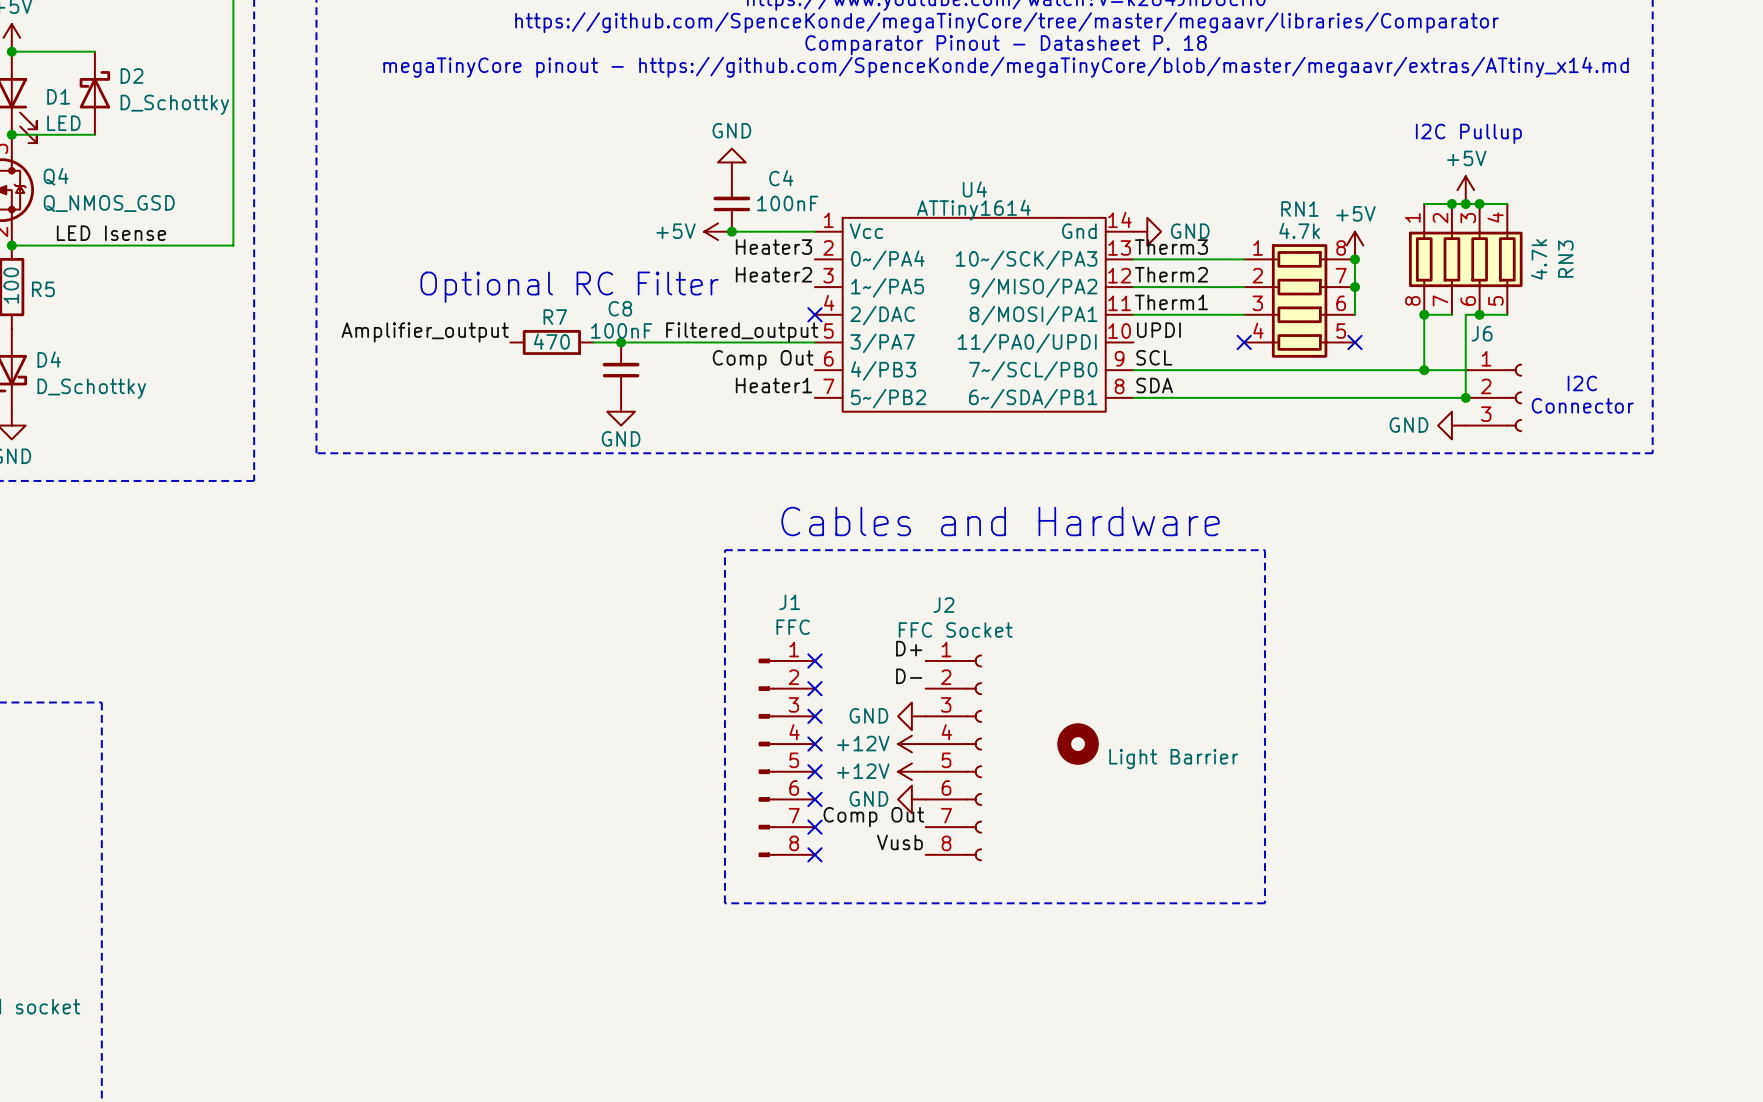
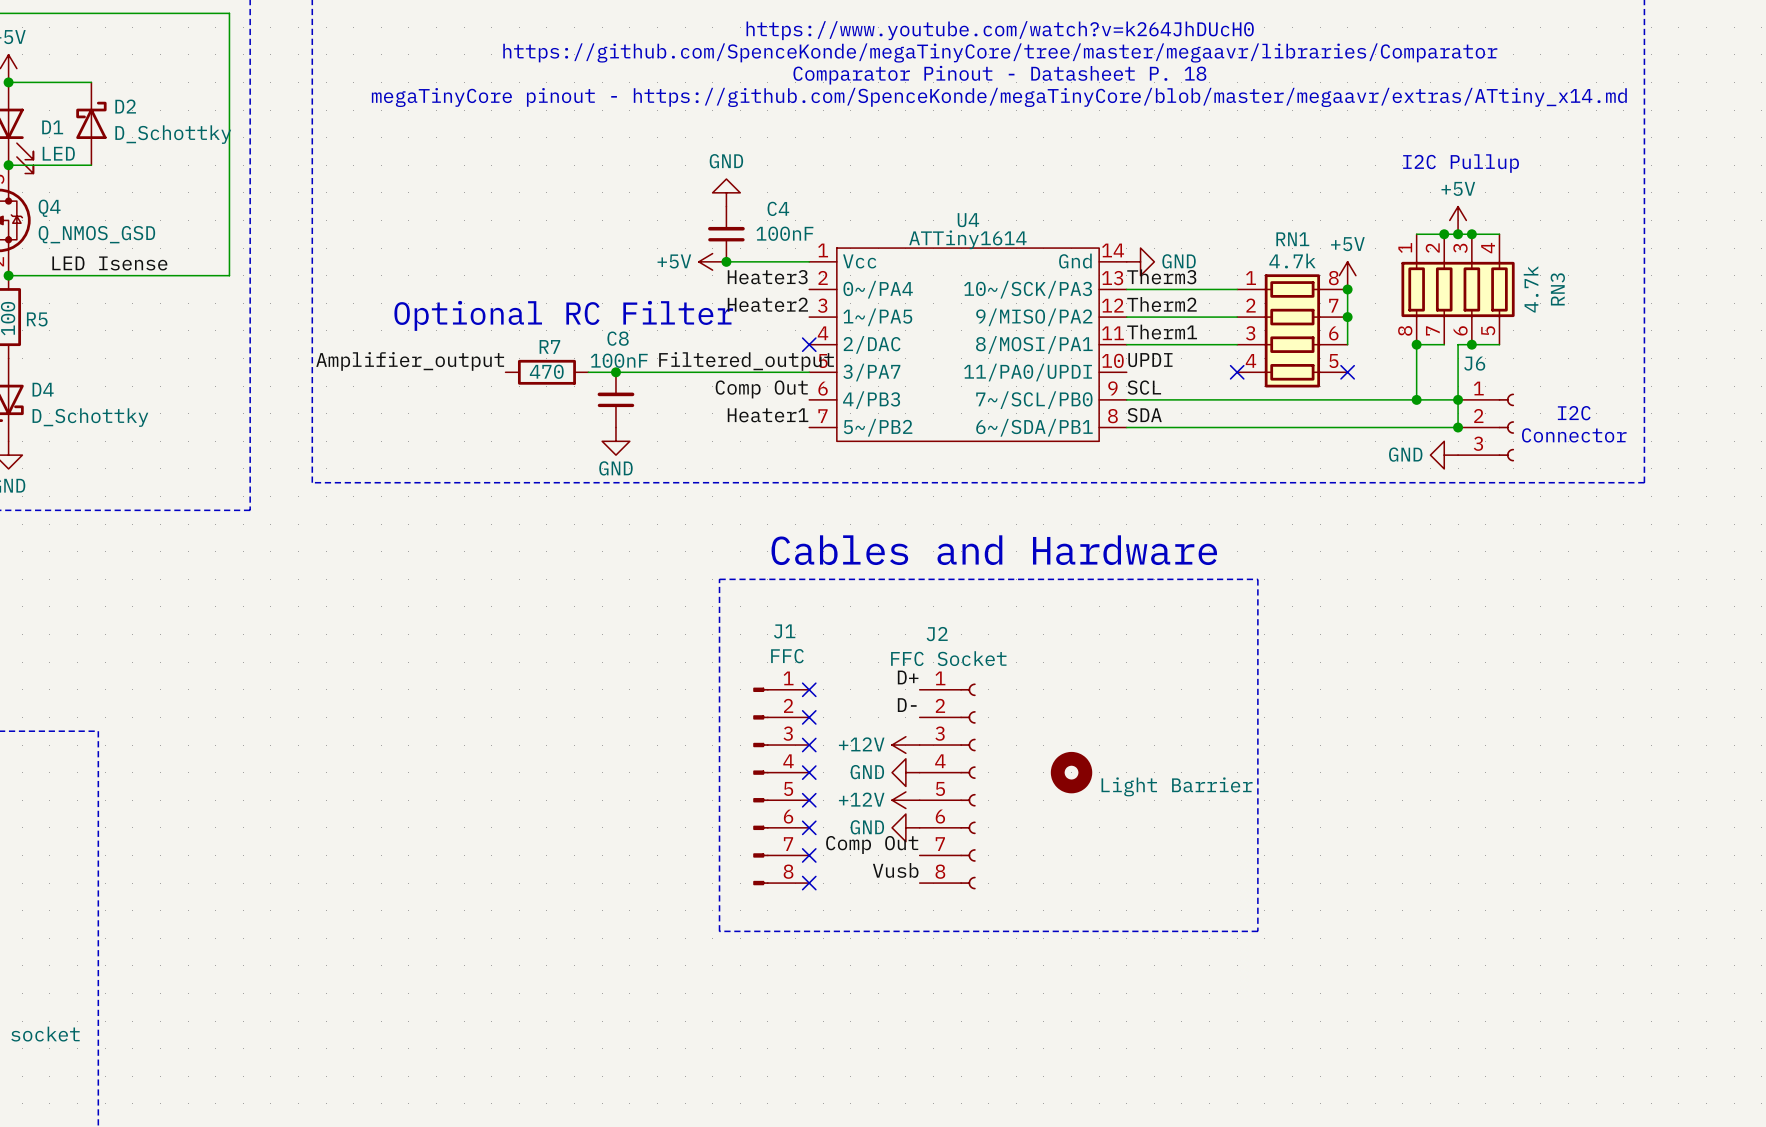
junction: none -> (1458, 399)
power symbol: GND (911, 716) -> +12V (905, 745)
power symbol: +12V (911, 744) -> GND (905, 772)

